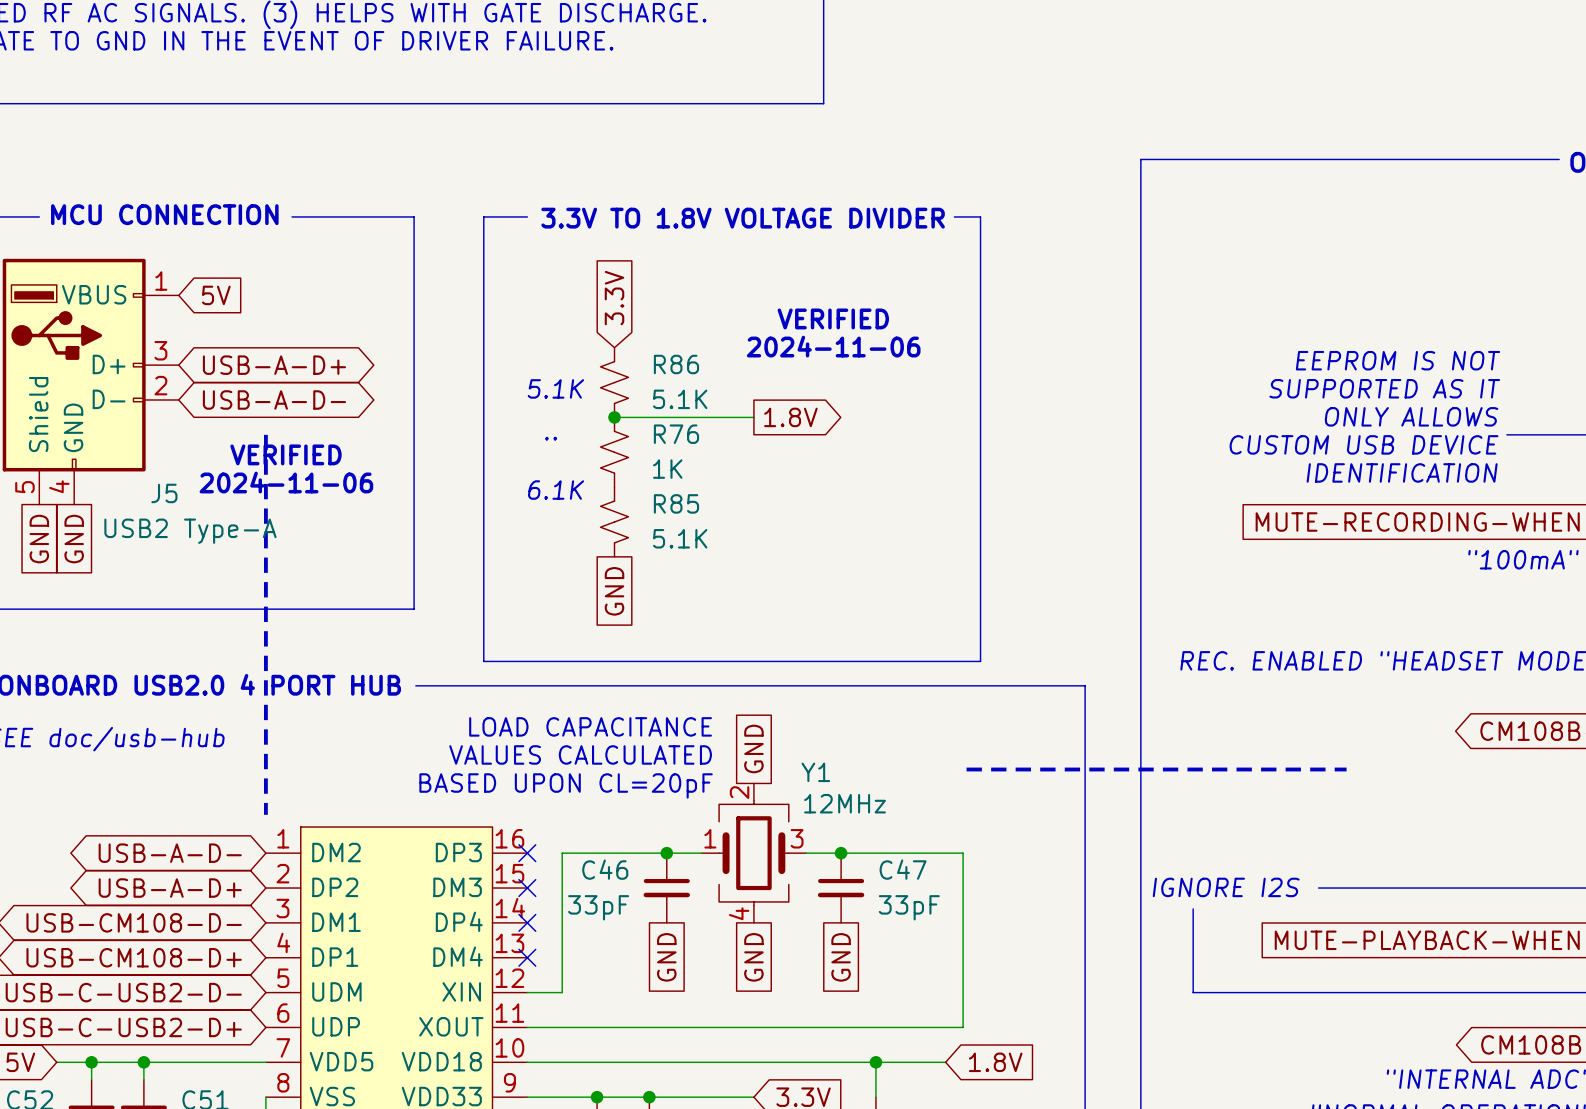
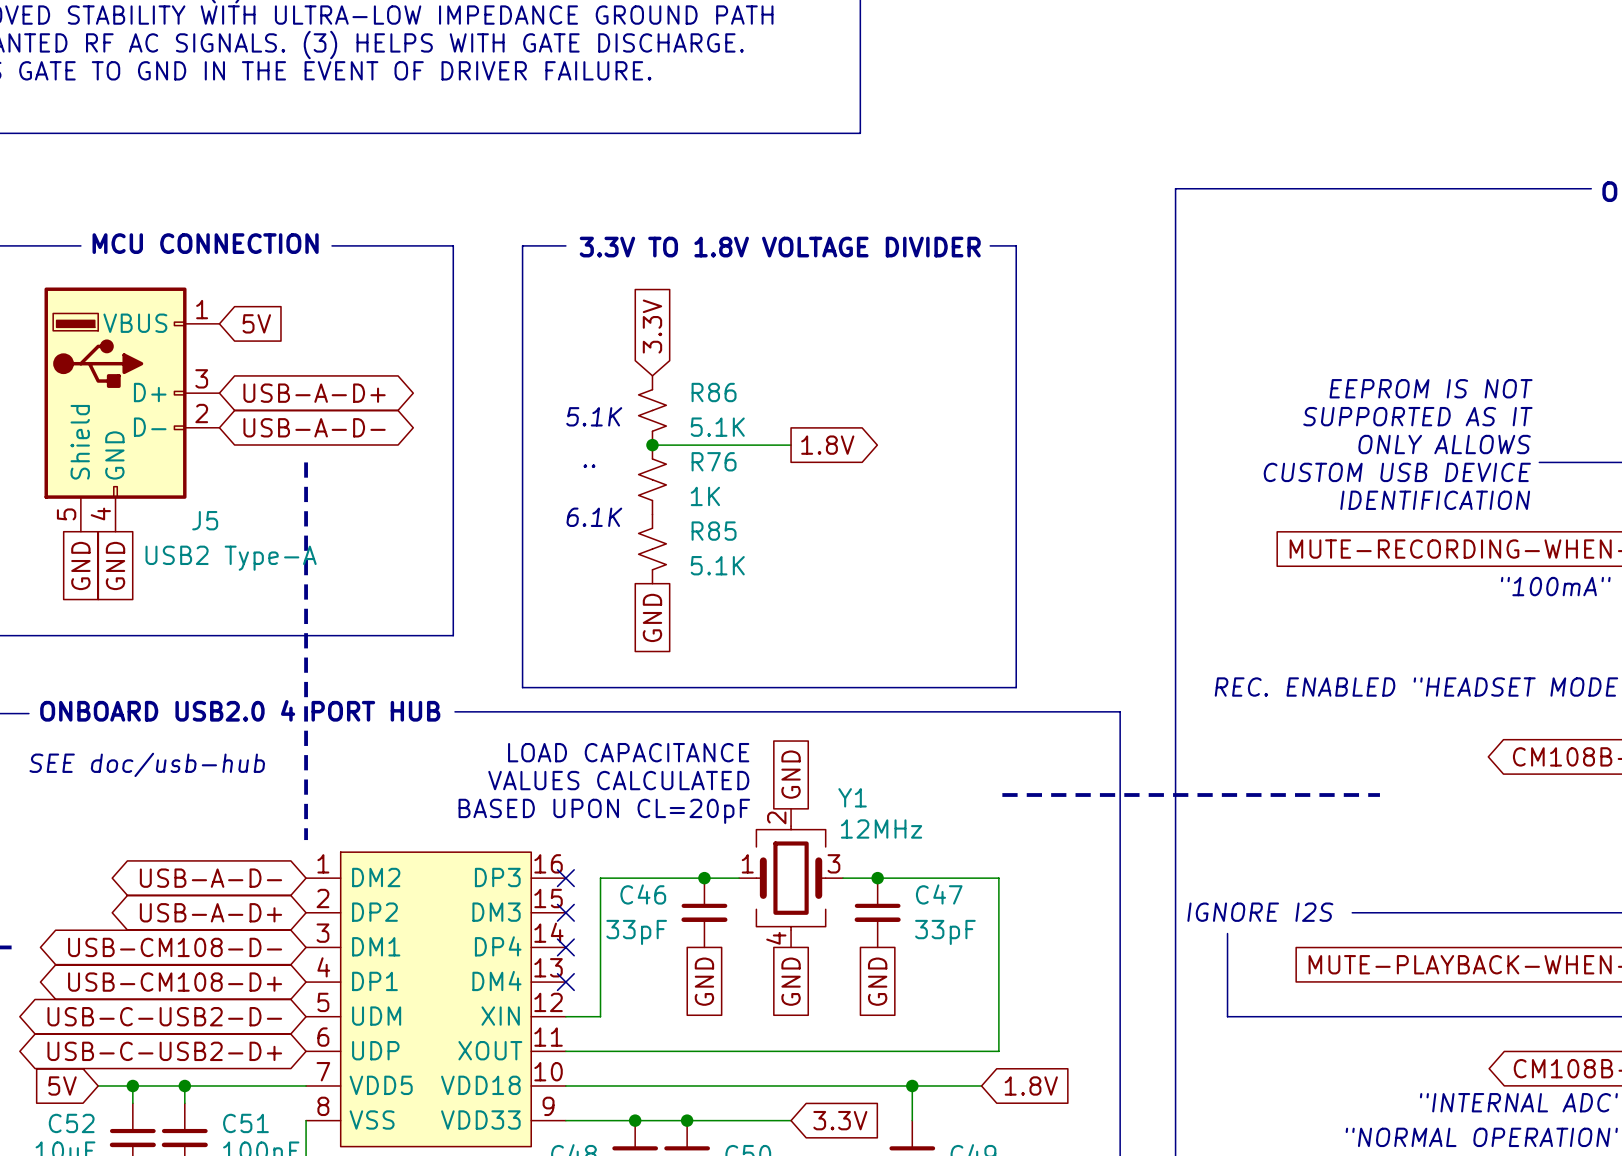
text: VERIFIED (833, 318) -> none
text: 2024-11-06 (833, 346) -> none
text: VERIFIED (286, 454) -> none
text: 2024-11-06 (286, 482) -> none

